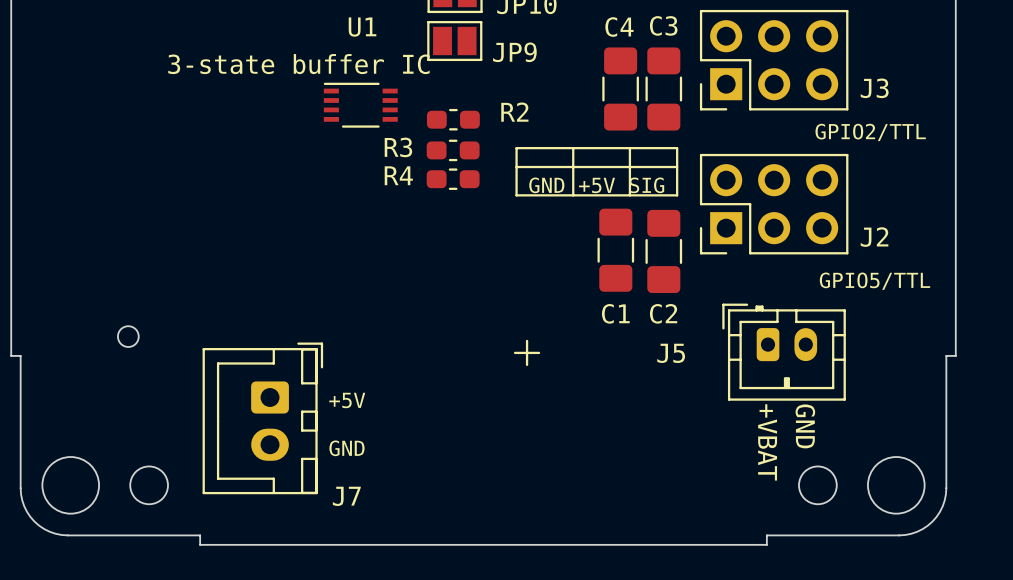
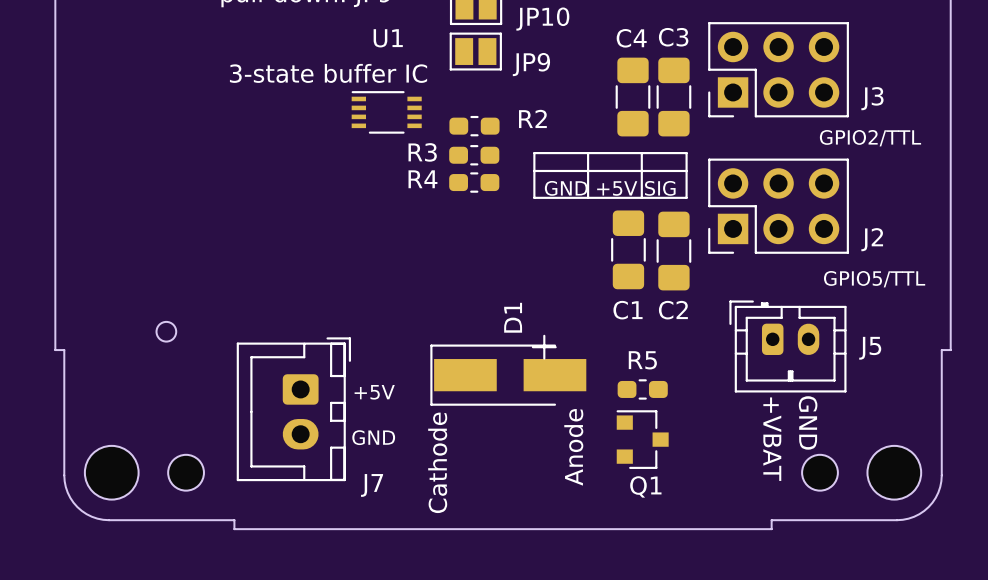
J5 name position: J5 (671, 353) -> J5 (870, 348)
D1: none -> (508, 375)
R5: none -> (642, 389)
Q1: none -> (642, 439)
text: none -> Anode (573, 447)
text: none -> Cathode (437, 462)

